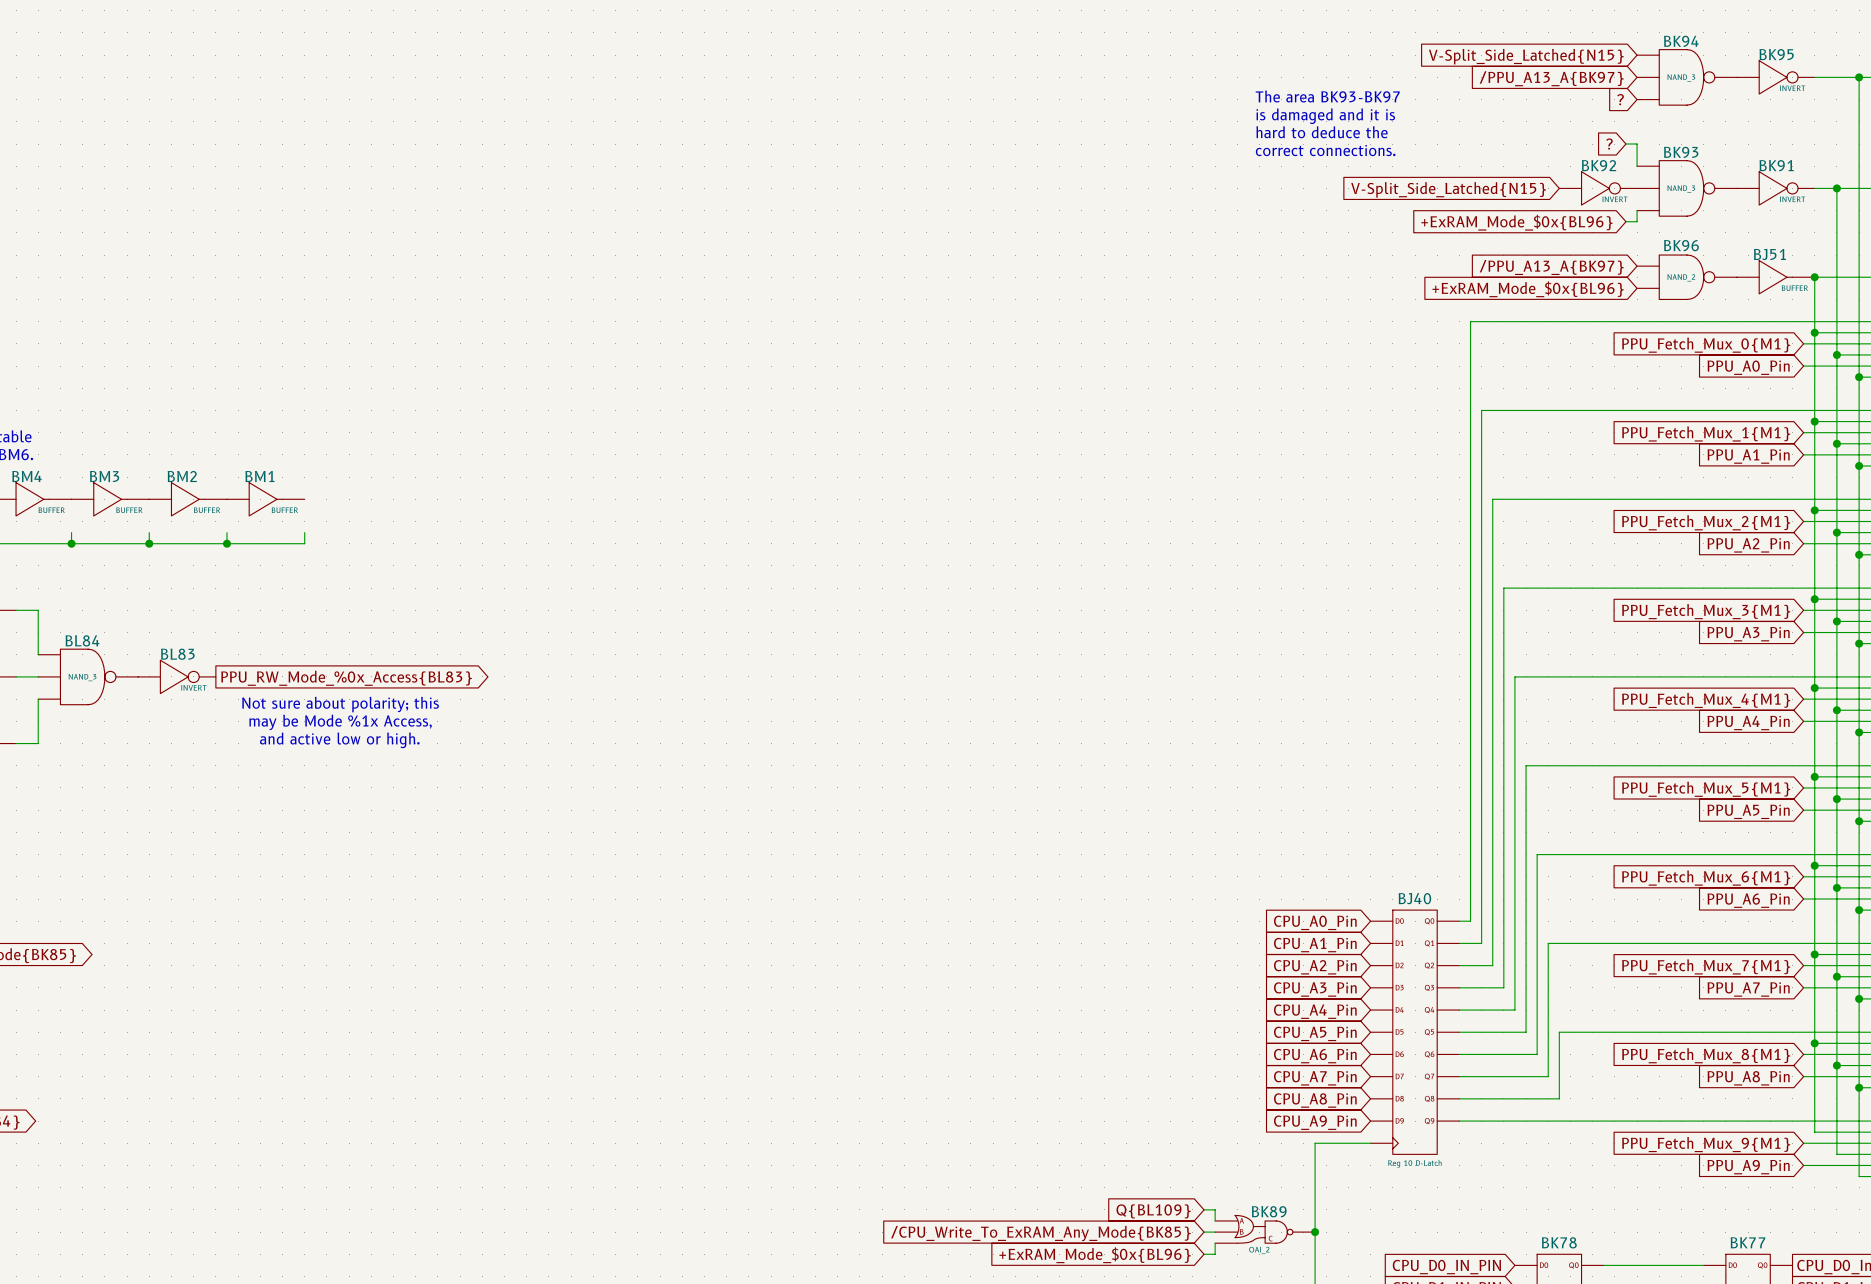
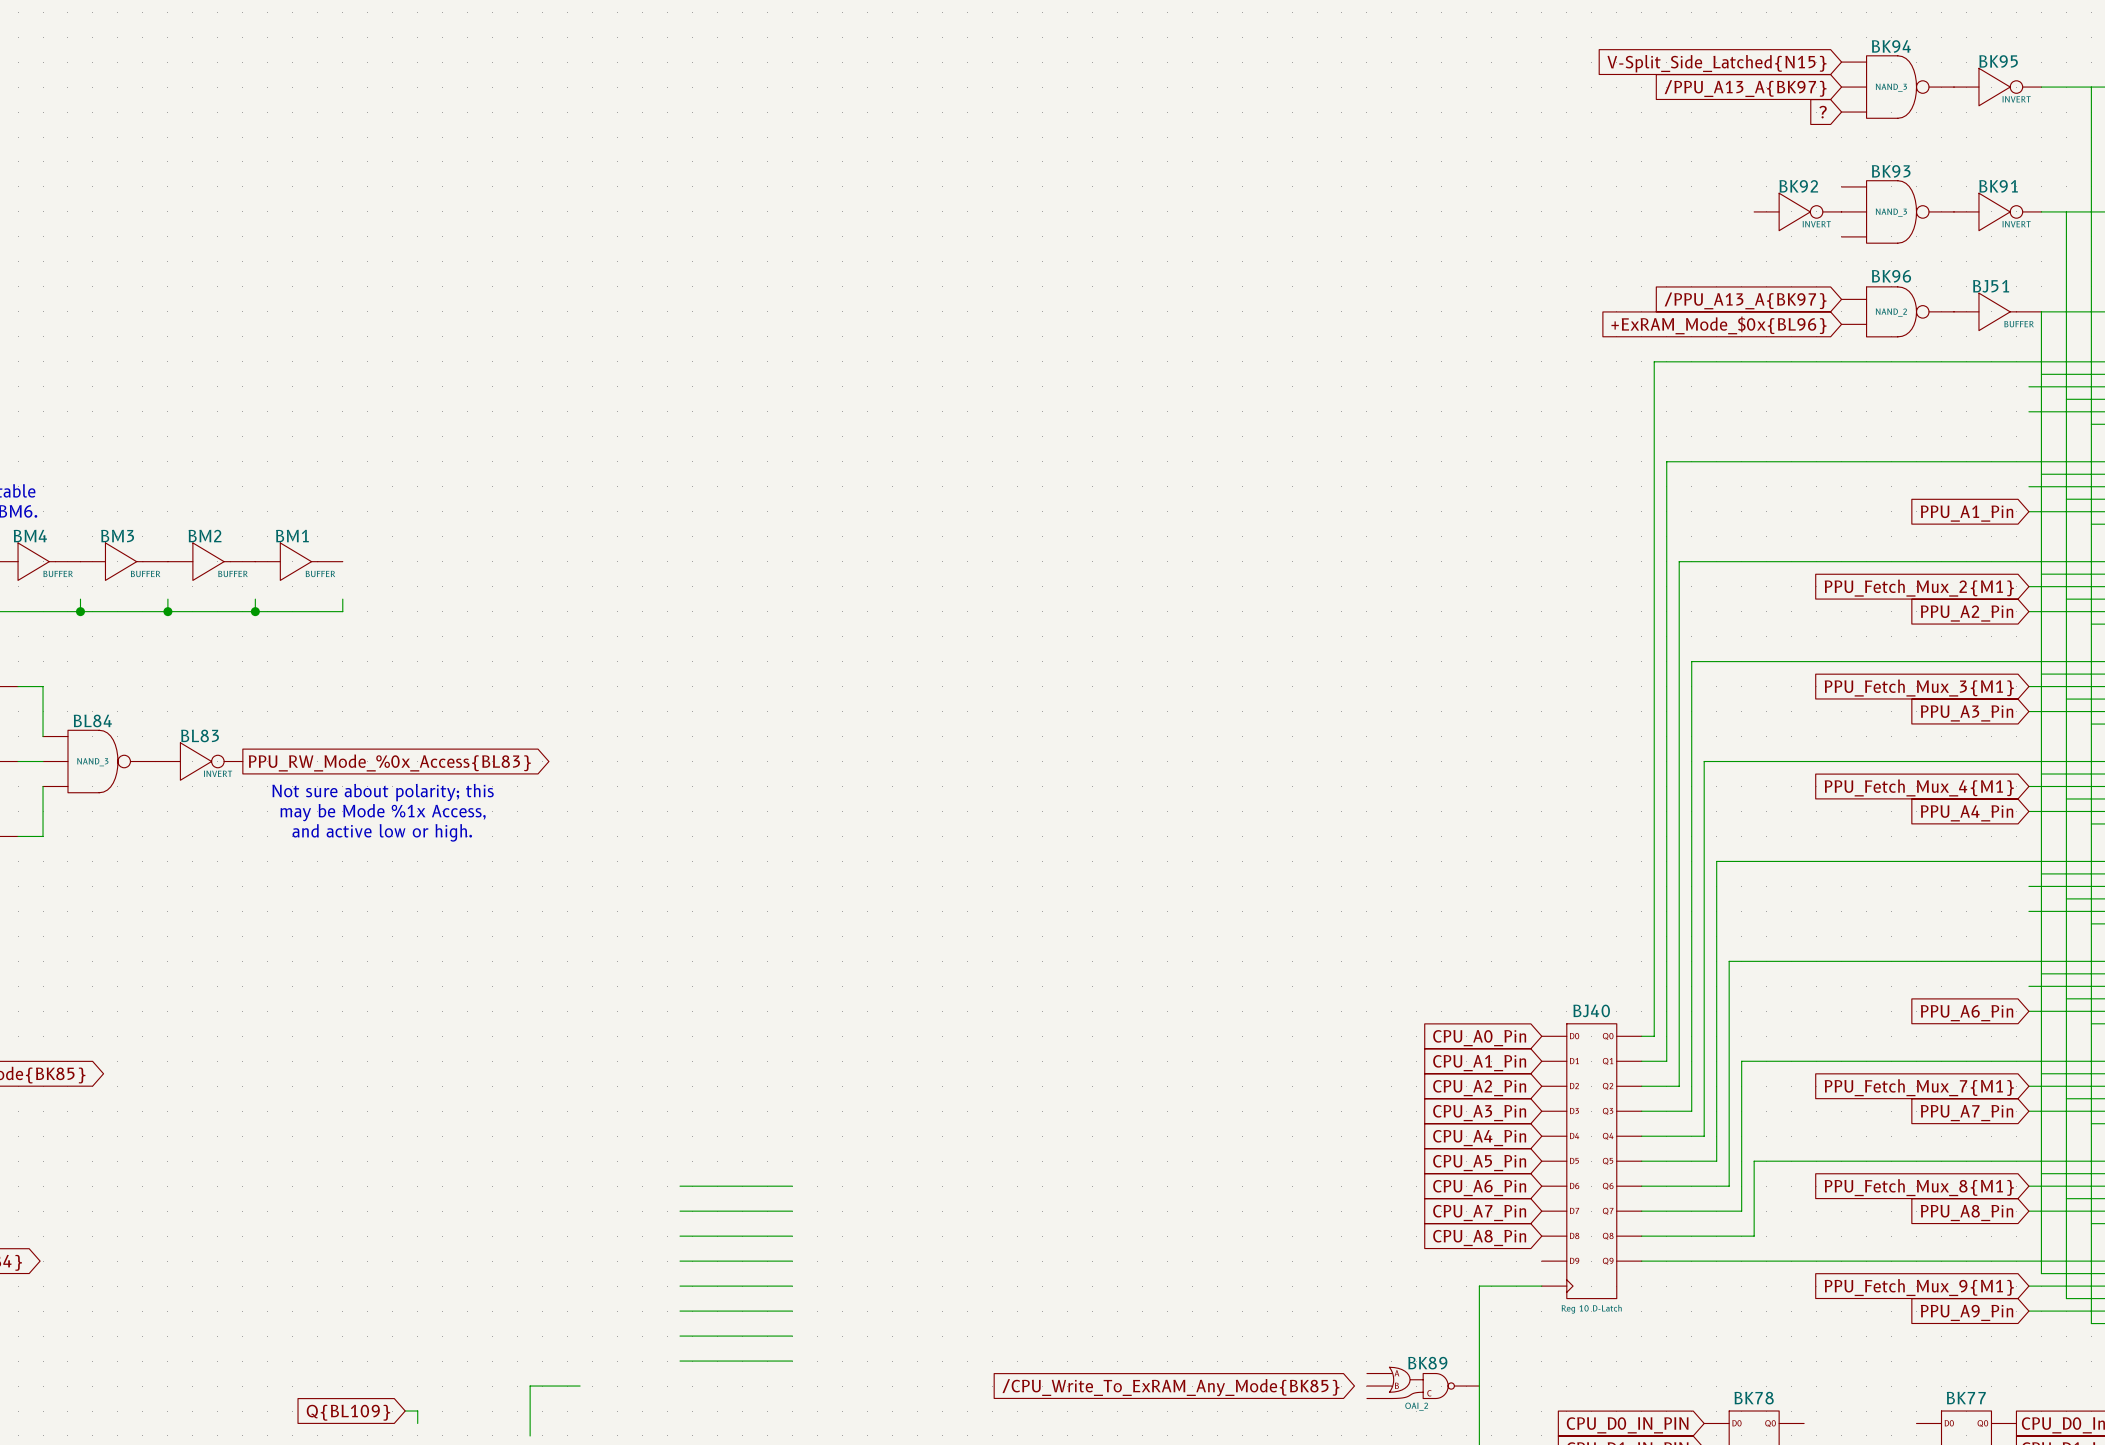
junction: (1859, 77) -> none
text: The area BK93-BK97 (1327, 96) -> none
text: is damaged and it is (1325, 116) -> none
text: hard to deduce the (1322, 132) -> none
global label: ? (1609, 144) -> none
wire: (1625, 144) (1637, 144) (1637, 166) -> none
text: correct connections. (1325, 150) -> none
junction: (1836, 188) -> none
global label: V-Split_Side_Latched{N15} (1448, 189) -> none
wire: (1637, 210) (1637, 221) (1625, 221) -> none
global label: +ExRAM_Mode_$0x{BL96} (1516, 222) -> none
junction: (1814, 277) -> none
junction: (1814, 332) -> none
global label: PPU_Fetch_Mux_0{M1} (1706, 345) -> none
junction: (1836, 354) -> none
global label: PPU_A0_Pin (1748, 367) -> none
junction: (1859, 377) -> none
junction: (1814, 421) -> none
global label: PPU_Fetch_Mux_1{M1} (1706, 433) -> none
junction: (1836, 443) -> none
junction: (1859, 465) -> none
junction: (1814, 510) -> none
junction: (1836, 532) -> none
junction: (1859, 554) -> none
junction: (1814, 599) -> none
junction: (1836, 621) -> none
junction: (1859, 643) -> none
junction: (1814, 688) -> none
junction: (1836, 710) -> none
junction: (1859, 732) -> none
junction: (1814, 776) -> none
global label: PPU_Fetch_Mux_5{M1} (1706, 789) -> none
junction: (1836, 799) -> none
global label: PPU_A5_Pin (1748, 811) -> none
junction: (1859, 821) -> none
junction: (1814, 865) -> none
global label: PPU_Fetch_Mux_6{M1} (1706, 878) -> none
junction: (1836, 887) -> none
junction: (1859, 910) -> none
junction: (1814, 954) -> none
junction: (1836, 976) -> none
junction: (1859, 998) -> none
junction: (1814, 1043) -> none
wire: none -> (680, 1186) (792, 1186)
junction: (1836, 1065) -> none
wire: none -> (680, 1211) (792, 1211)
junction: (1859, 1087) -> none
wire: none -> (680, 1236) (792, 1236)
wire: none -> (680, 1261) (792, 1261)
global label: CPU_A9_Pin (1315, 1122) -> none
wire: none -> (680, 1286) (792, 1286)
wire: none -> (680, 1311) (792, 1311)
wire: none -> (680, 1336) (792, 1336)
wire: none -> (680, 1361) (792, 1361)
wire: (1204, 1209) (1215, 1209) (1215, 1220) -> none
global label: Q{BL109} (1153, 1211) -> none
wire: none -> (580, 1386) (530, 1386) (530, 1435)
wire: (1204, 1232) (1215, 1232) -> none
junction: (1315, 1232) -> none
wire: (1215, 1243) (1215, 1254) (1204, 1254) -> none
wire: none -> (405, 1411) (417, 1411) (417, 1423)
global label: none -> Q{BL109} (348, 1412)
global label: +ExRAM_Mode_$0x{BL96} (1095, 1255) -> none
wire: (1603, 1265) (1703, 1265) -> none

